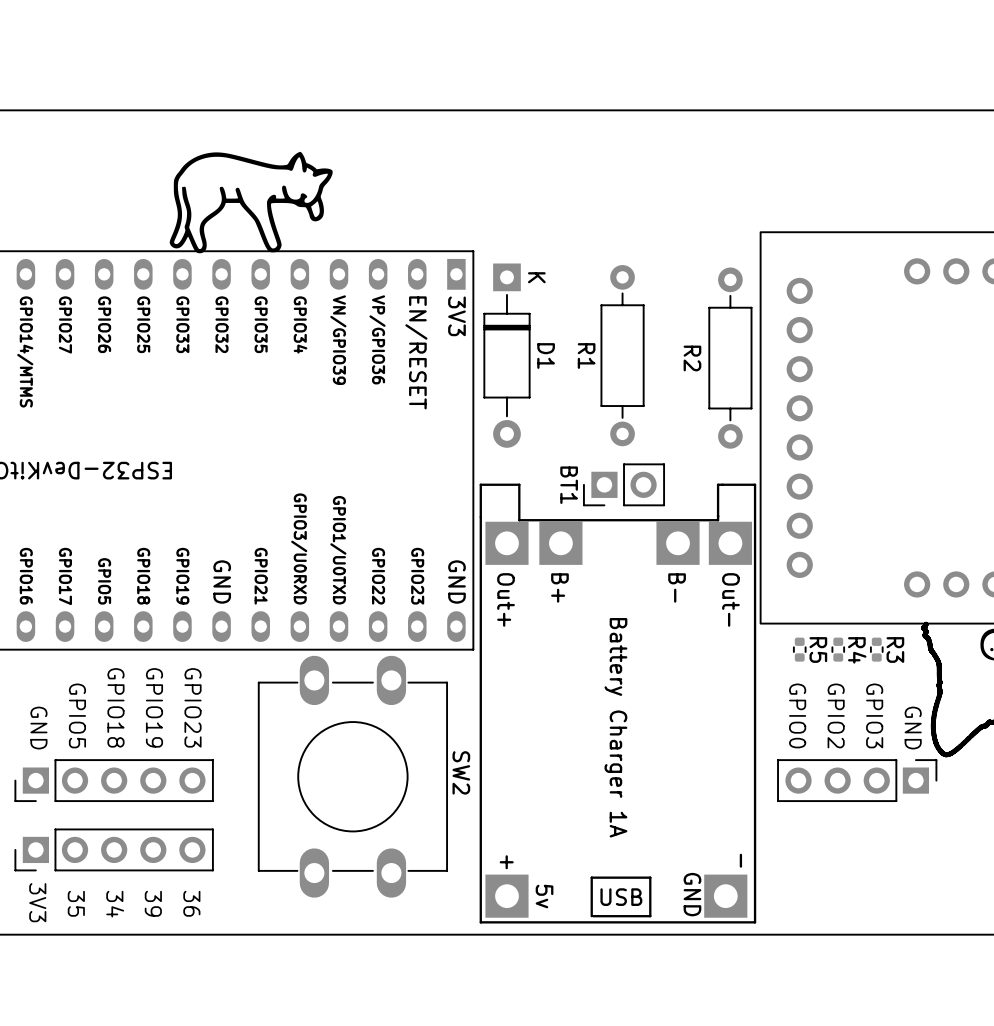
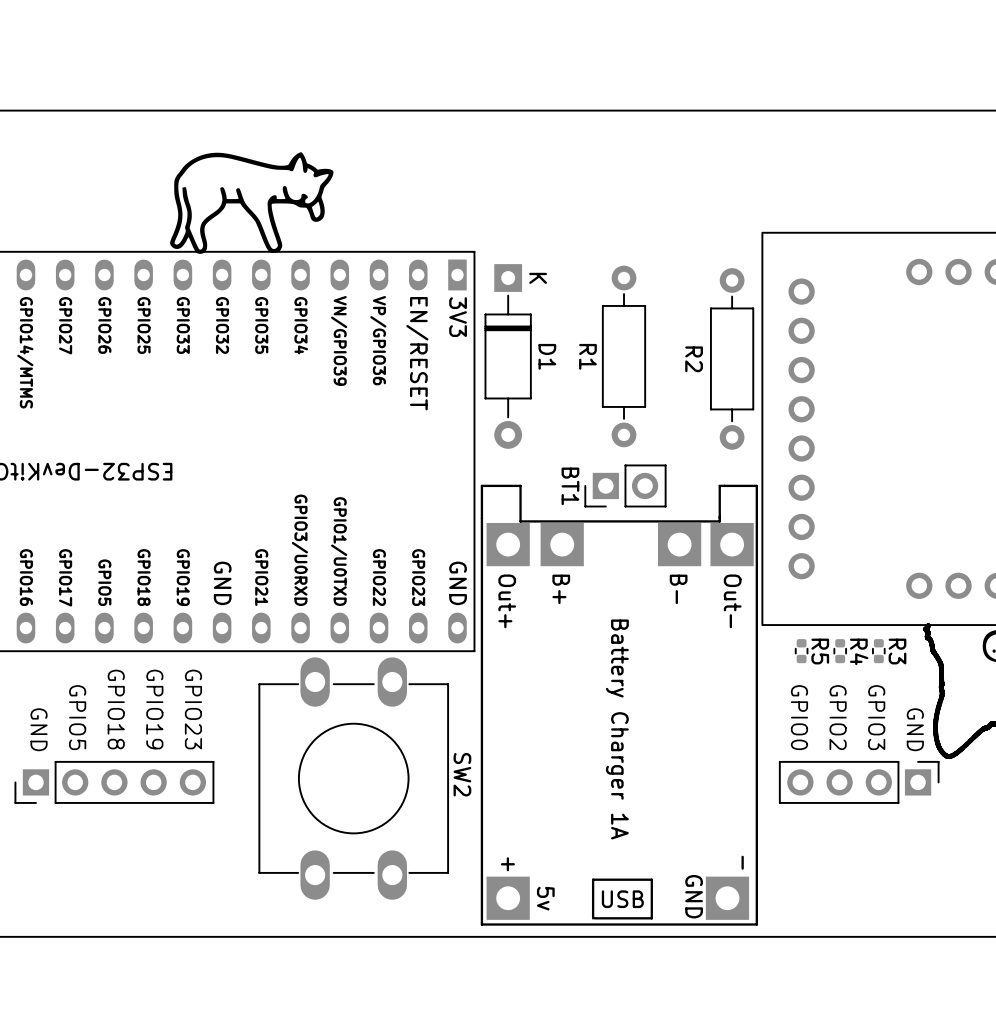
part: (114, 849) -> none
text: 3V3 (37, 902) -> none
text: 35 (76, 903) -> none
text: 39 (153, 903) -> none
text: 36 (191, 903) -> none
text: 34 (115, 904) -> none

